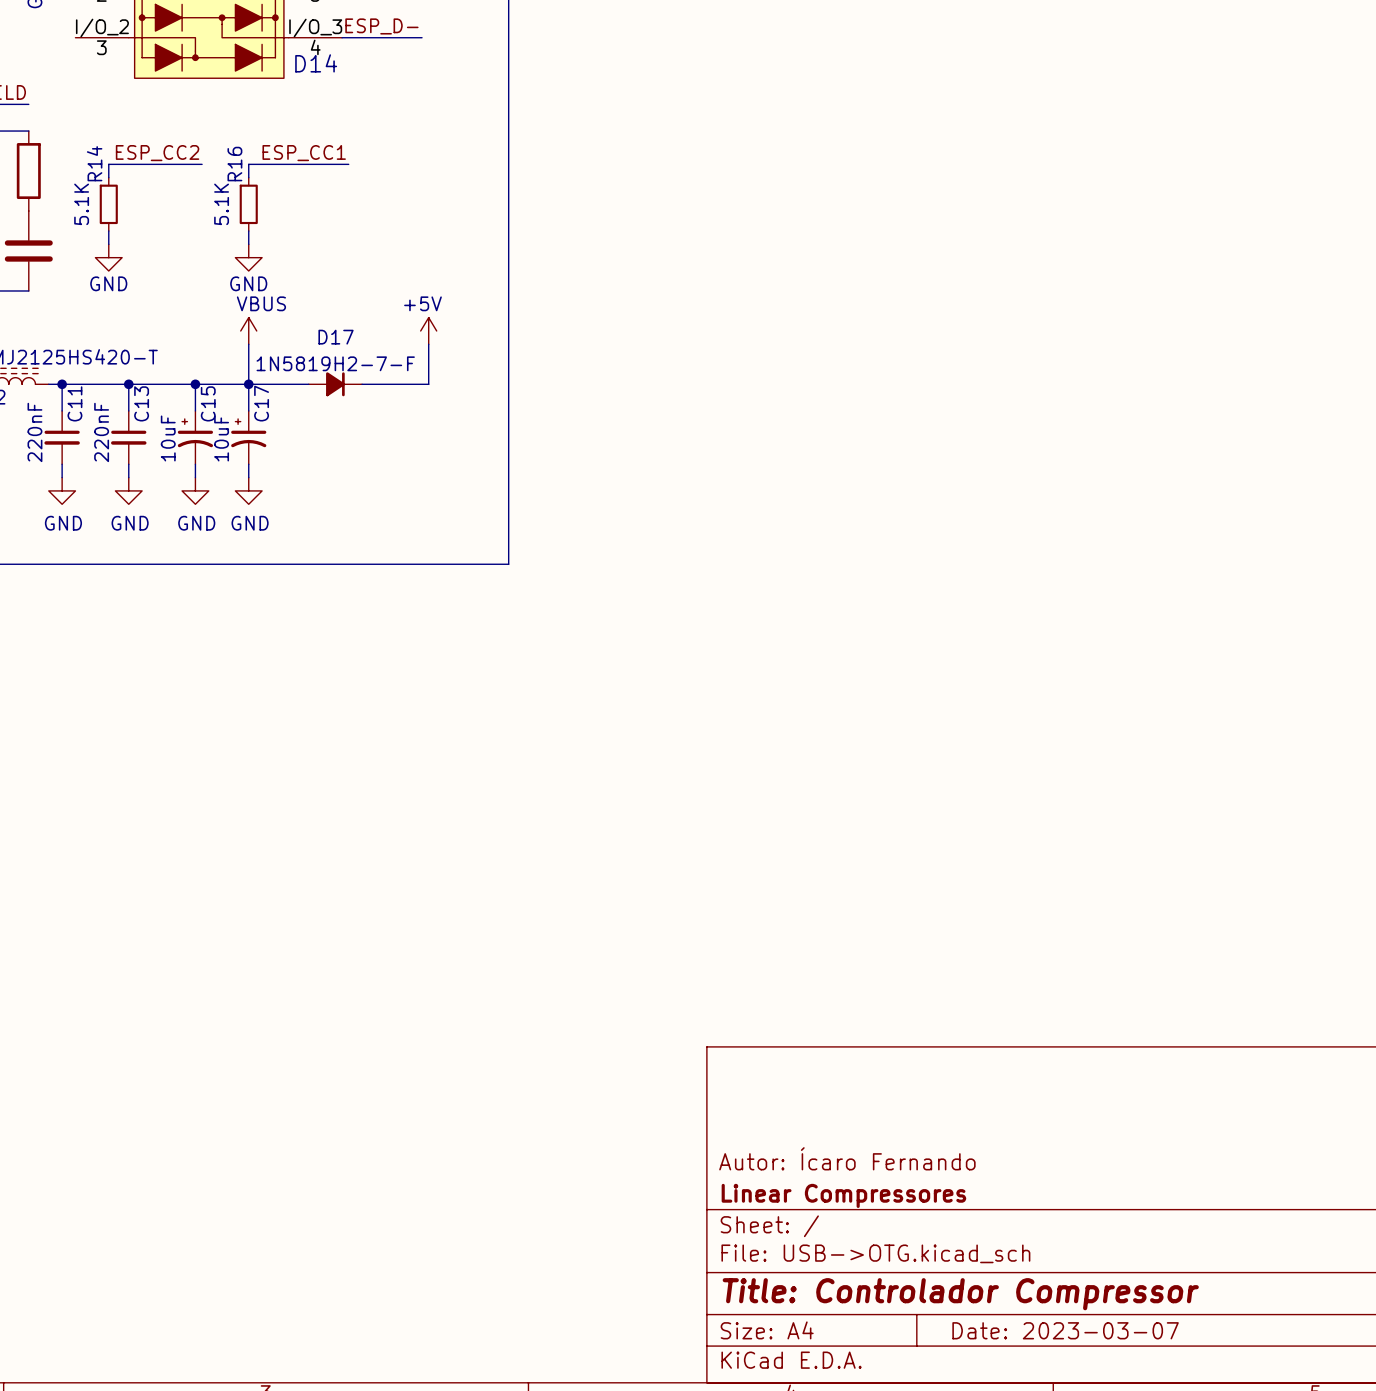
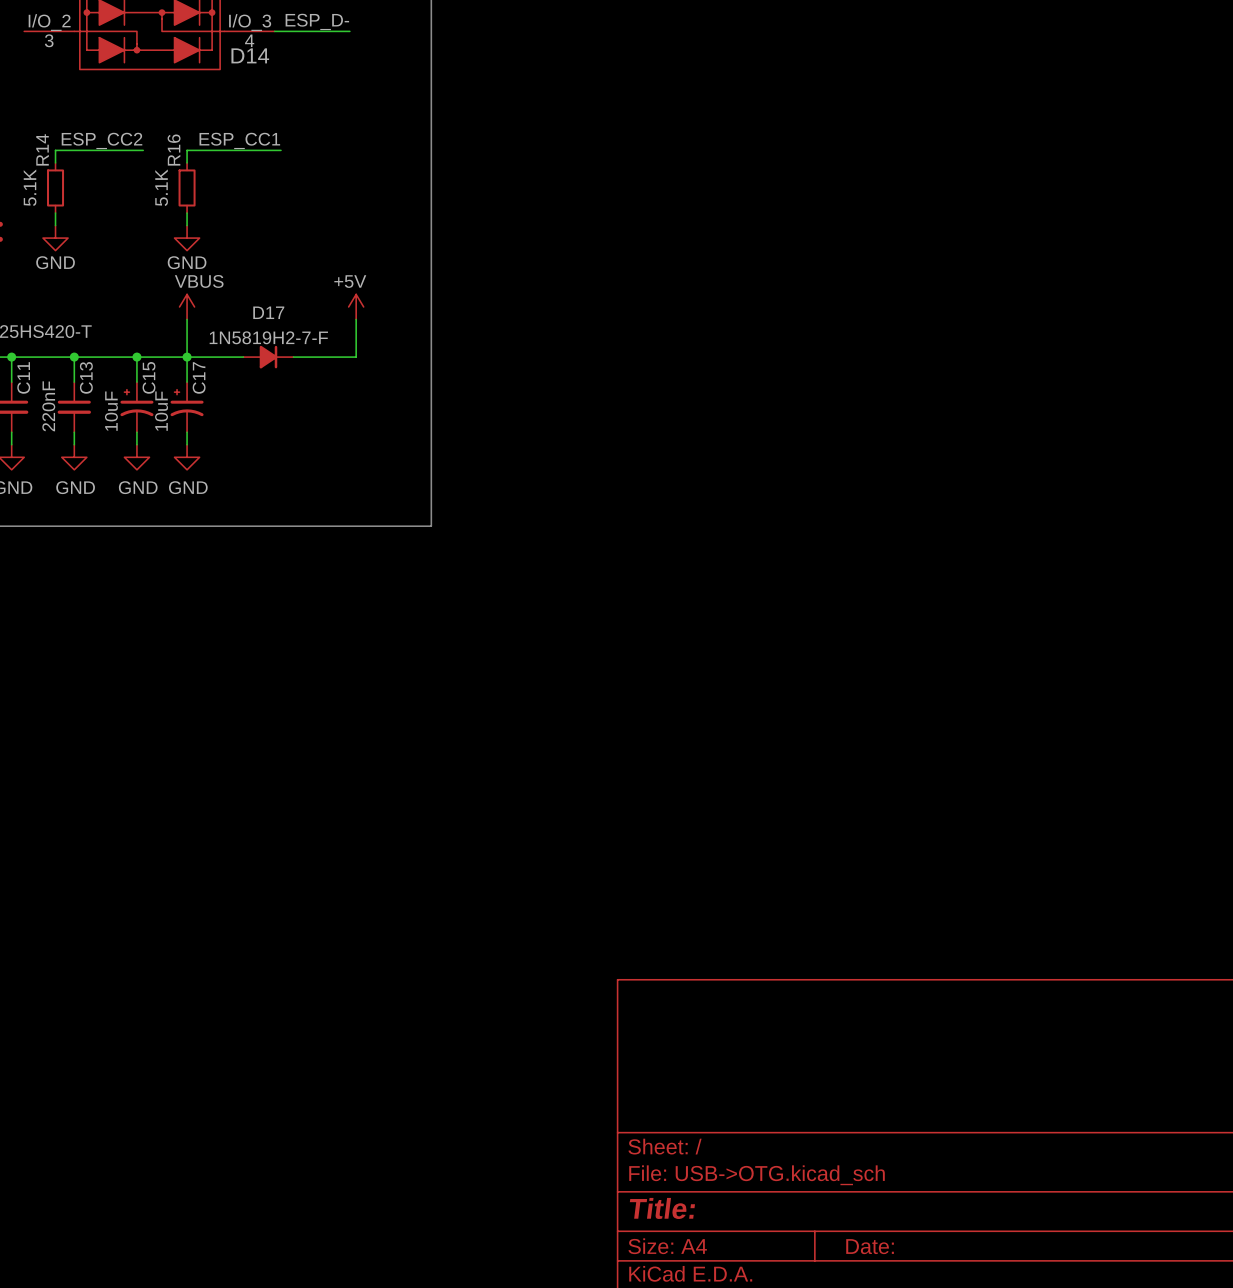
title block: Autor: Ícaro Fernando (847, 1158) -> none
title block: Linear Compressores (843, 1195) -> none
title block: Title: Controlador Compressor (960, 1294) -> Title: (662, 1208)
title block: Date: 2023-03-07 (1065, 1330) -> Date: (870, 1246)

